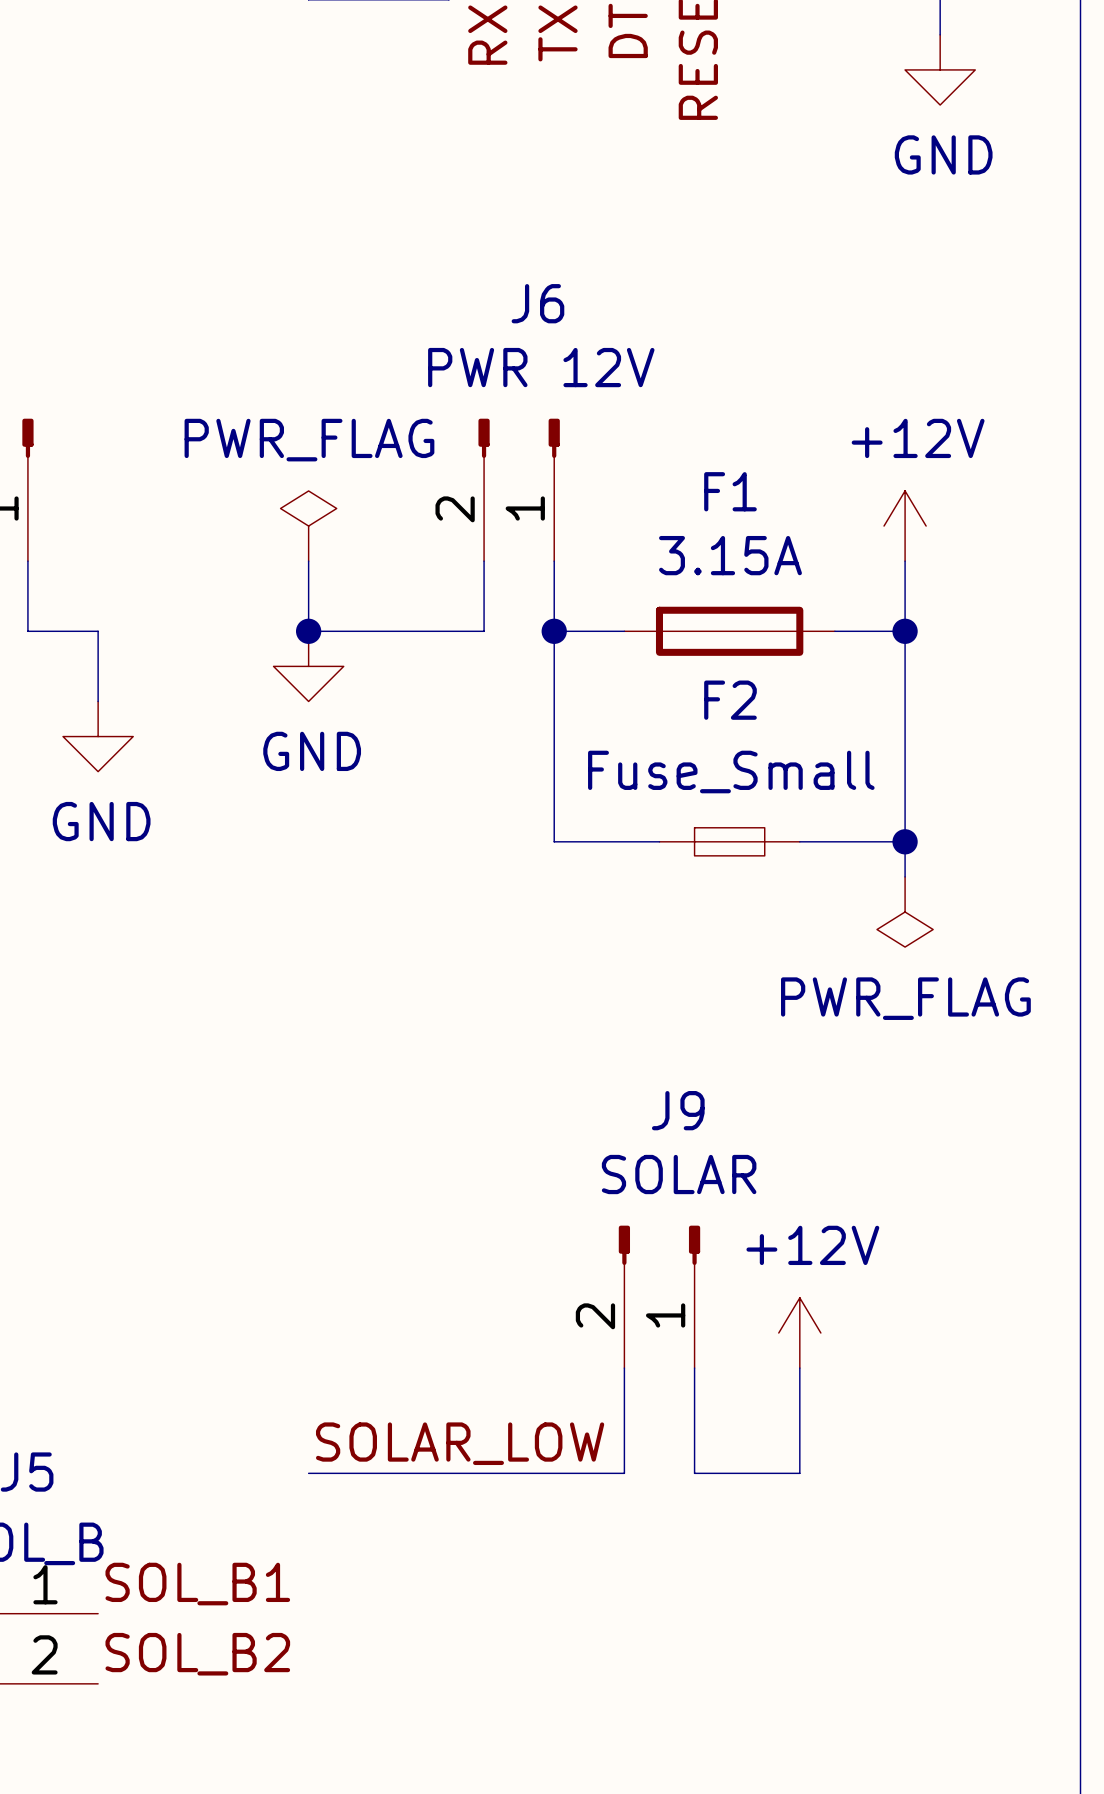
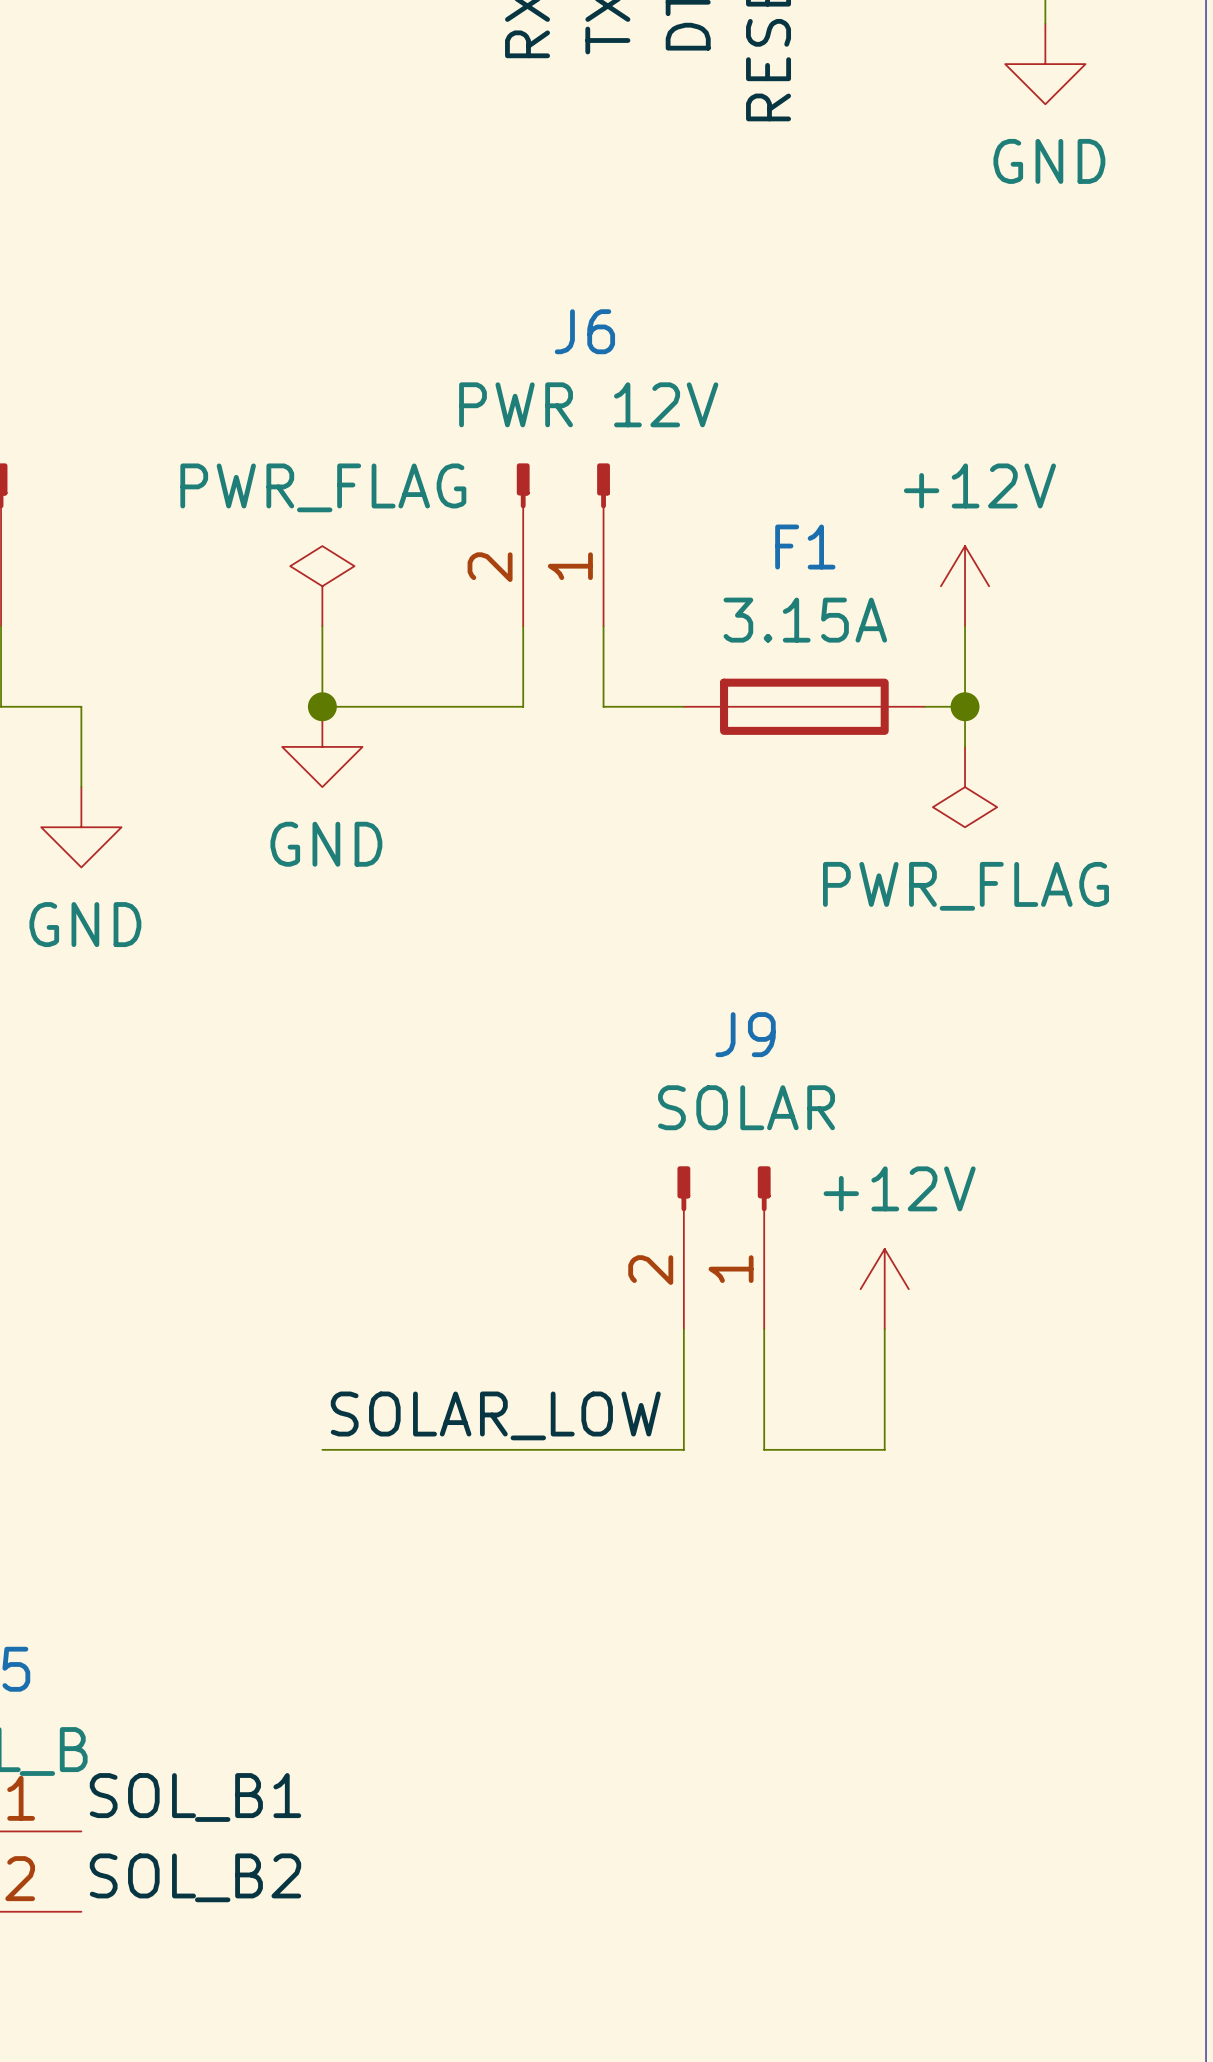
power symbol position: +12V (905, 526) -> +12V (965, 586)
wire: none -> (965, 626) (965, 746)
wire: (905, 561) (905, 876) -> none
wire: (554, 631) (554, 841) (659, 841) -> none
junction: (554, 631) -> none
wire: (869, 631) (905, 631) -> none
junction position: (905, 631) -> (965, 706)
F2: Fuse_Small (729, 841) -> none
wire: (799, 841) (905, 841) -> none
junction: (905, 841) -> none
power symbol position: PWR_FLAG (905, 911) -> PWR_FLAG (965, 787)
J9 position: (659, 1296) -> (724, 1247)
power symbol position: +12V (799, 1333) -> +12V (884, 1289)
wire: (624, 1368) (624, 1473) (308, 1473) -> (683, 1329) (683, 1449) (322, 1449)
wire: (694, 1368) (694, 1473) (799, 1473) (799, 1368) -> (764, 1329) (764, 1449) (884, 1449) (884, 1329)
label position: SOLAR_LOW (460, 1443) -> SOLAR_LOW (495, 1415)

